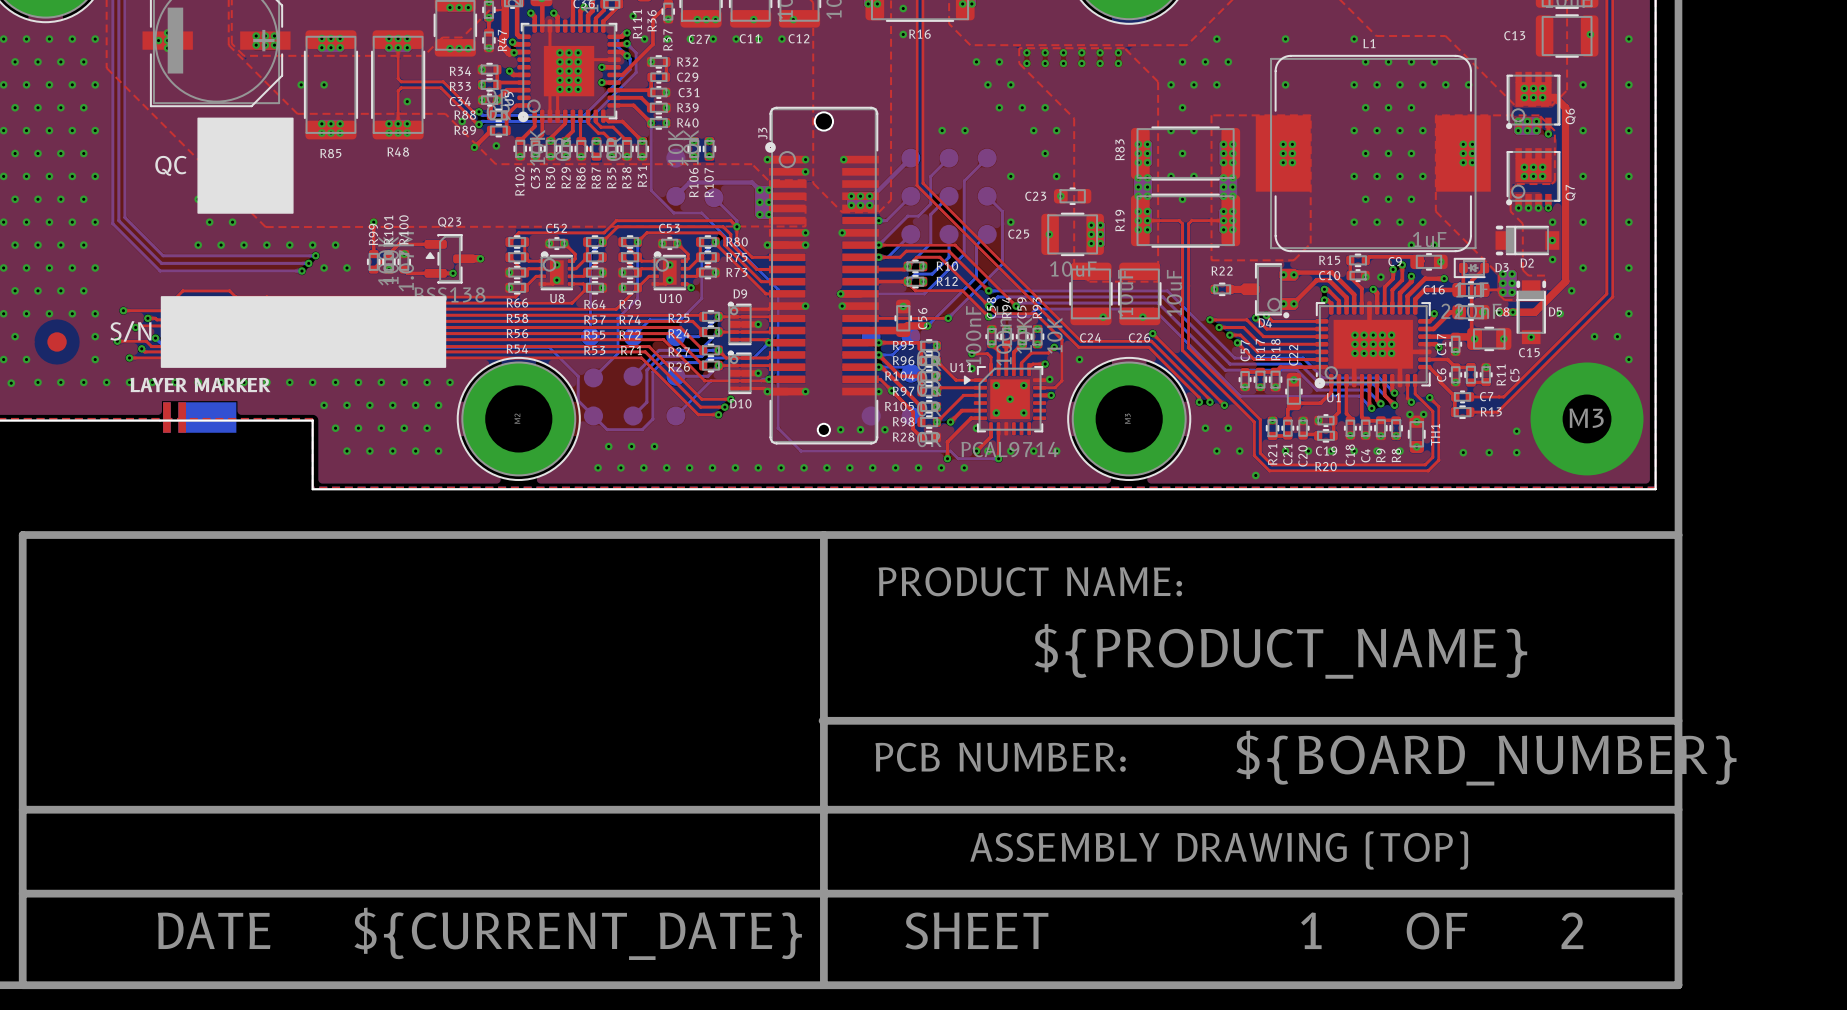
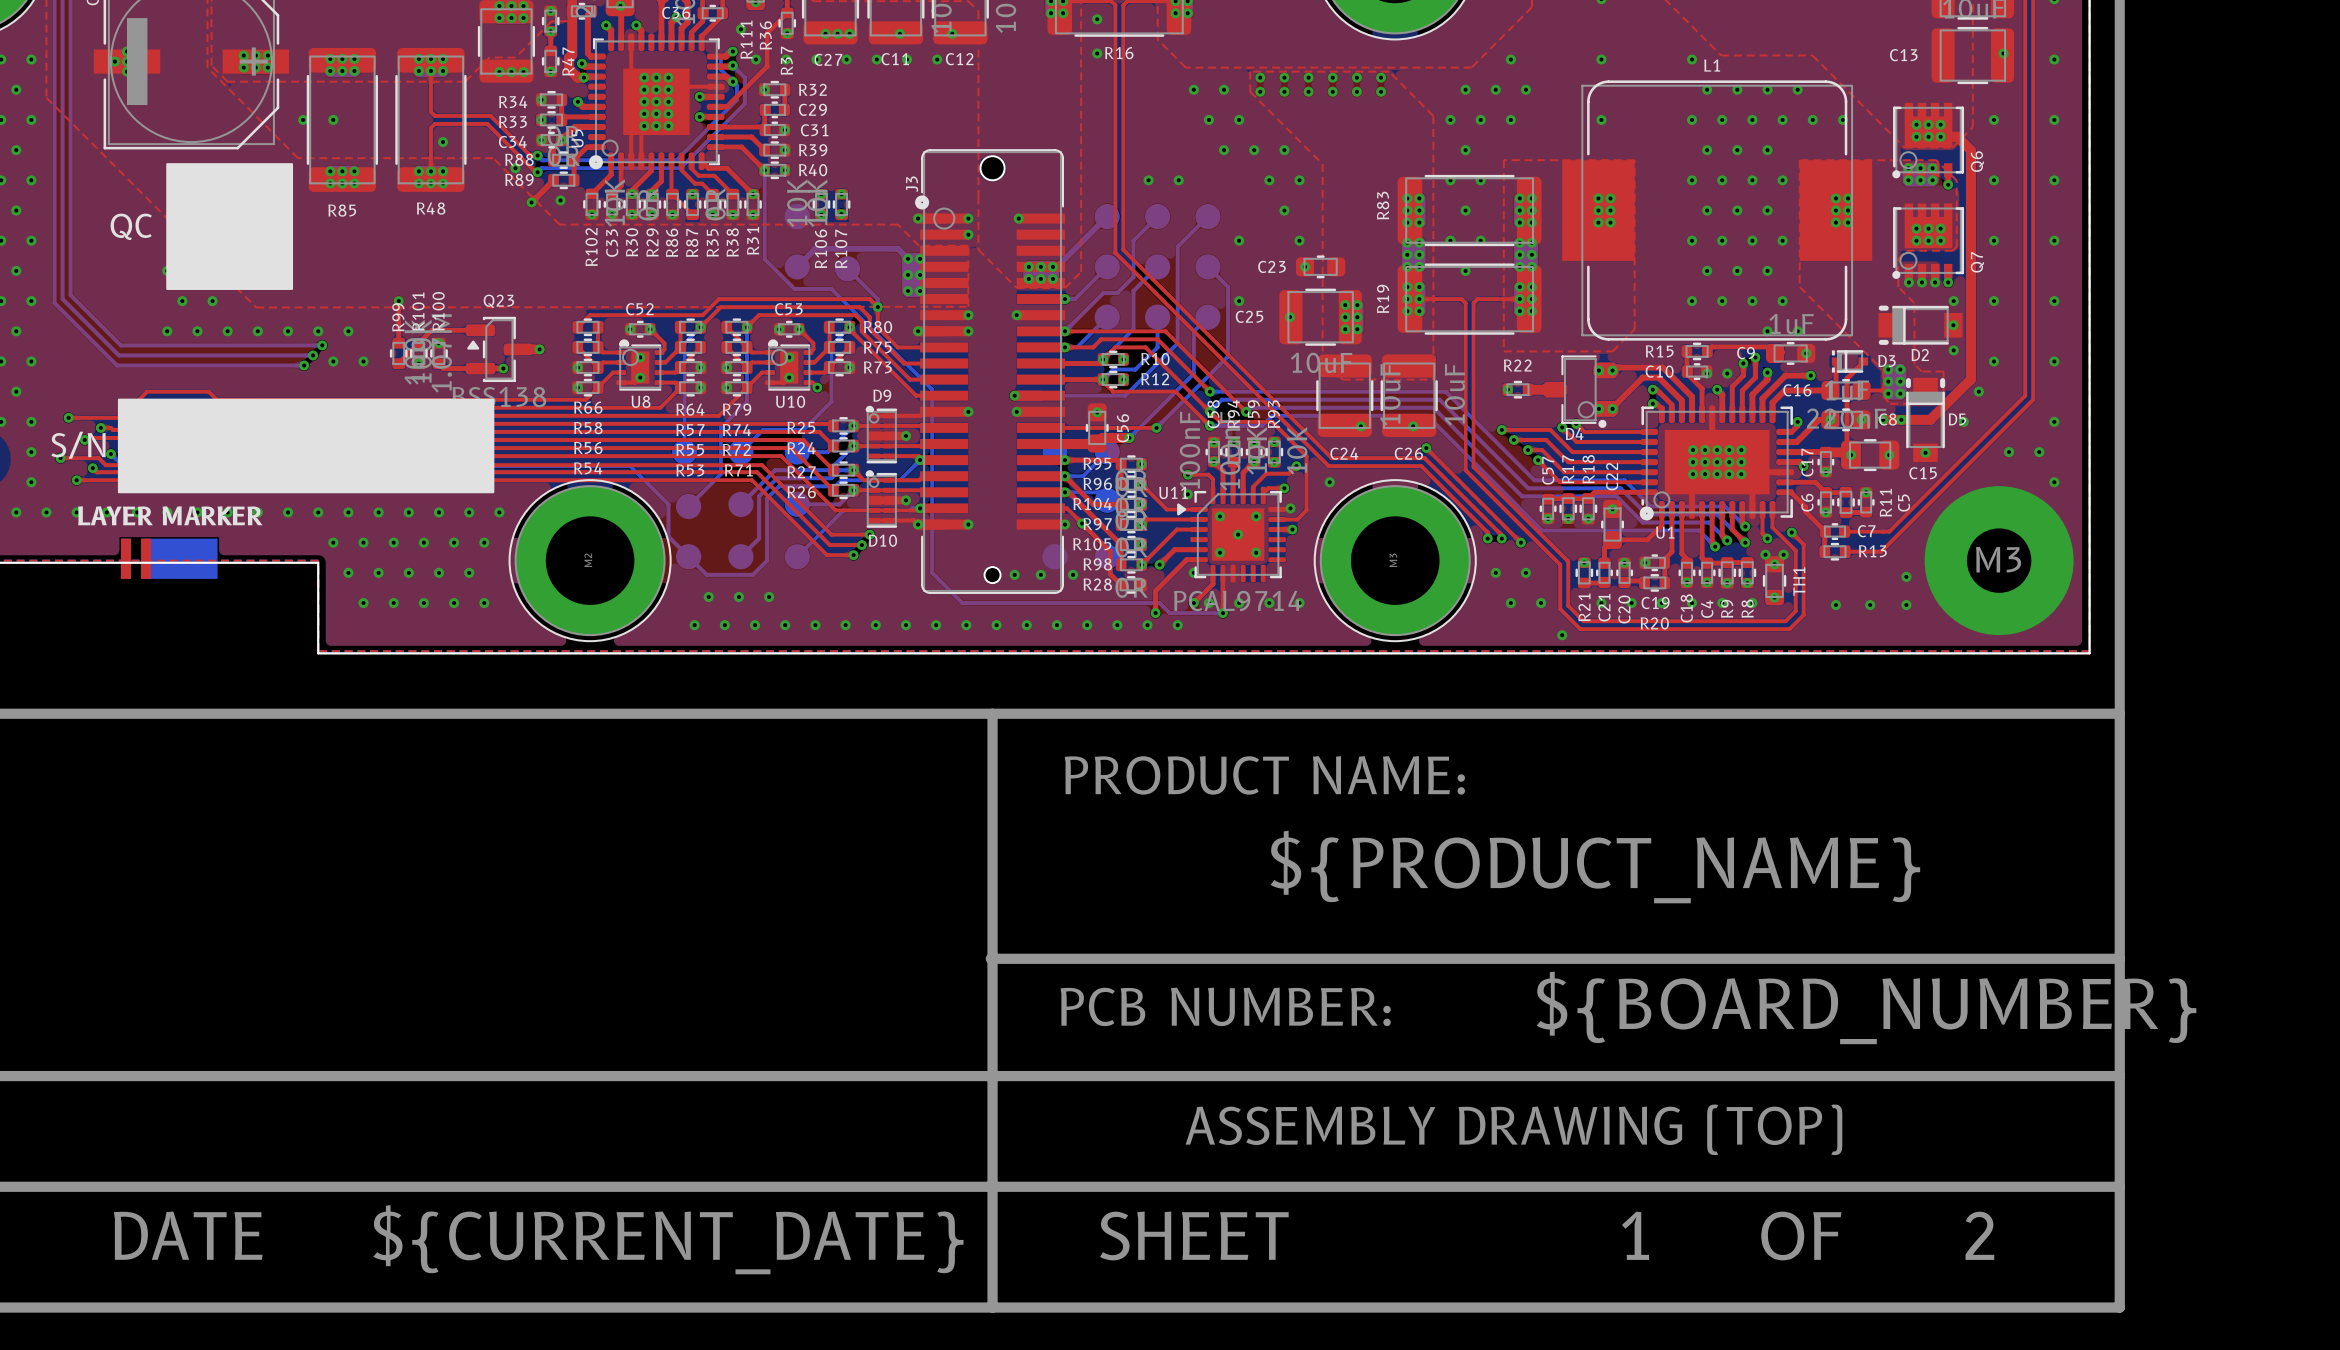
D3 footprint: [1453, 257, 1490, 279] -> [1831, 350, 1869, 373]

